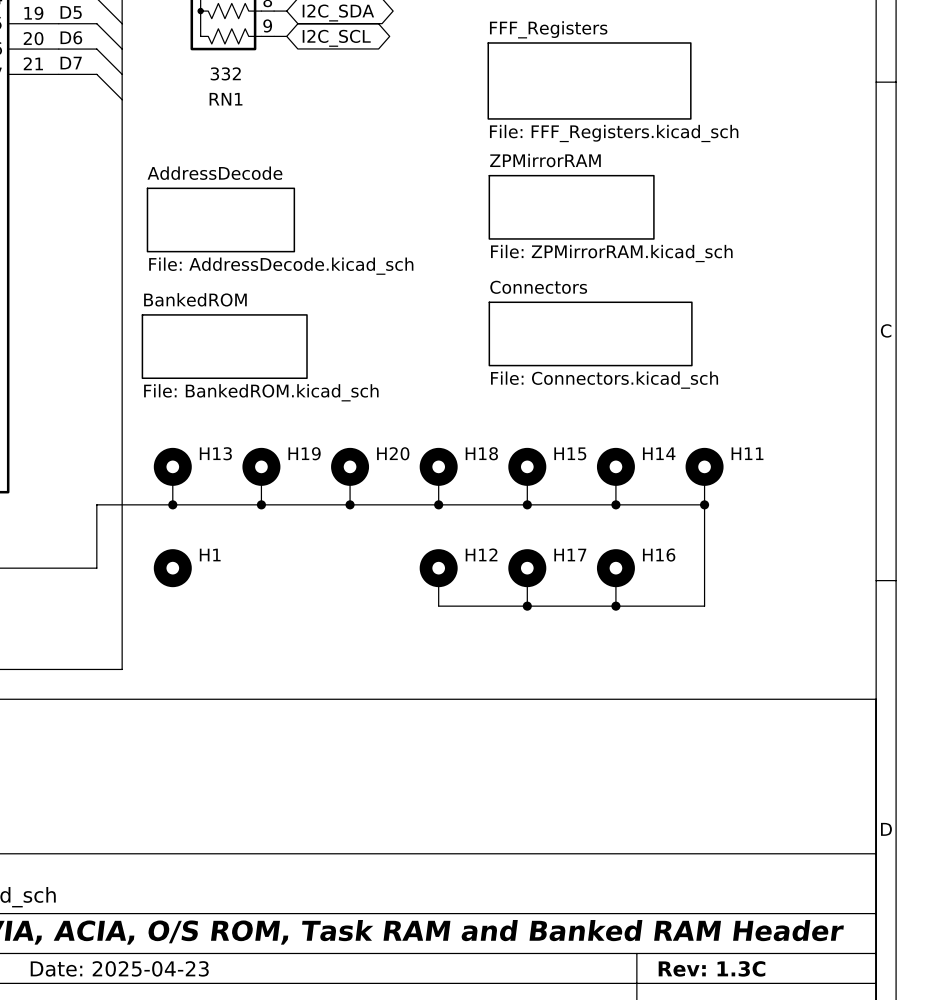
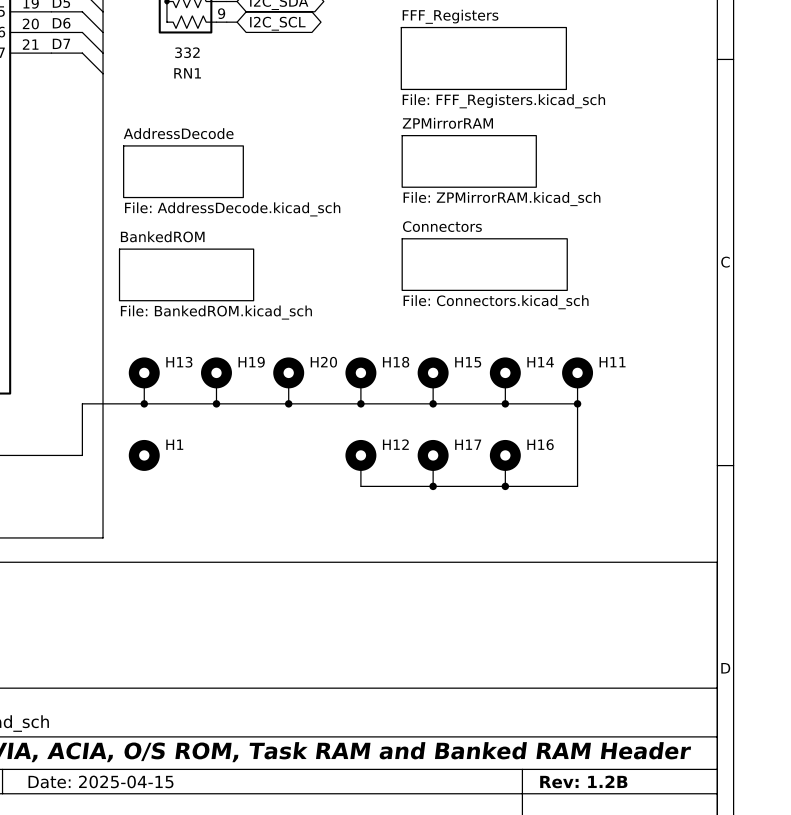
title block: Date: 2025-04-23 (119, 968) -> Date: 2025-04-15 (100, 781)
title block: Rev: 1.3C (712, 968) -> Rev: 1.2B (583, 781)

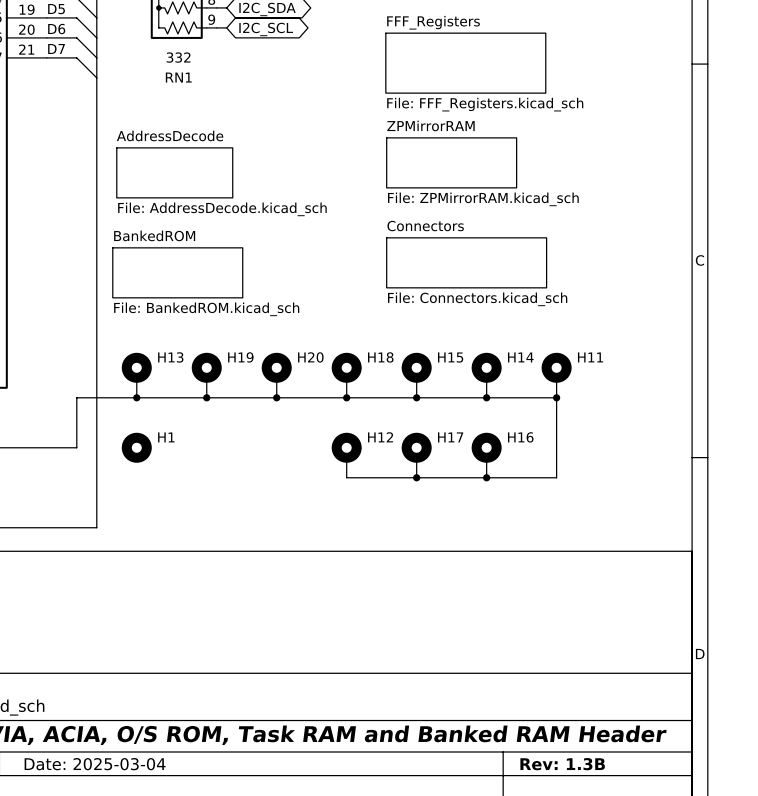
title block: Date: 2025-04-15 (100, 781) -> Date: 2025-03-04 (95, 764)
title block: Rev: 1.2B (583, 781) -> Rev: 1.3B (562, 764)

